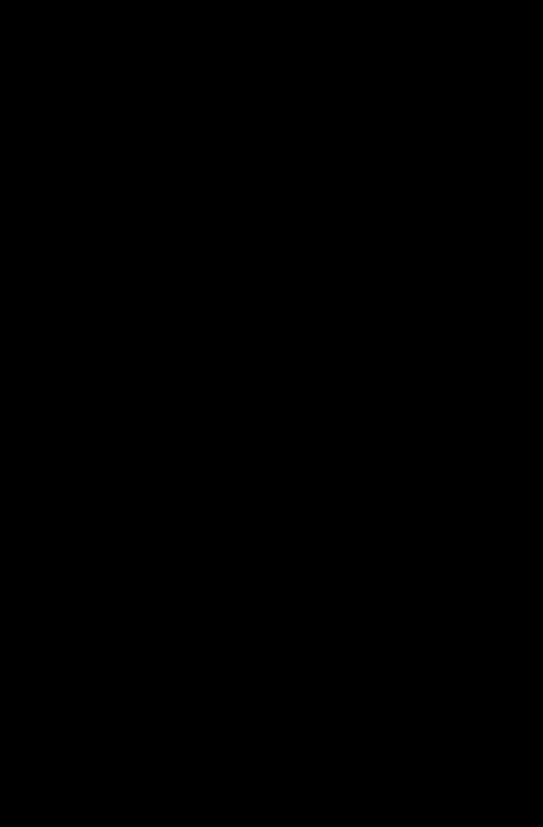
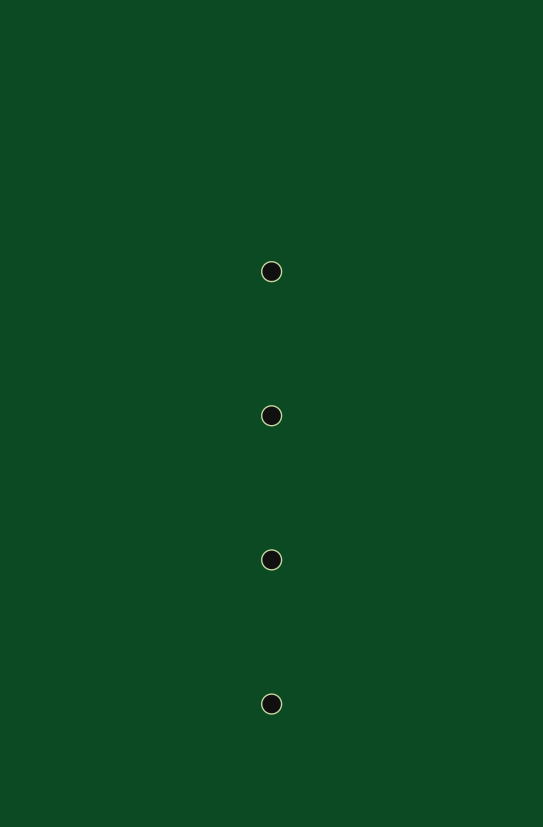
hole: none -> (271, 271)
hole: none -> (271, 415)
hole: none -> (271, 559)
hole: none -> (271, 704)

